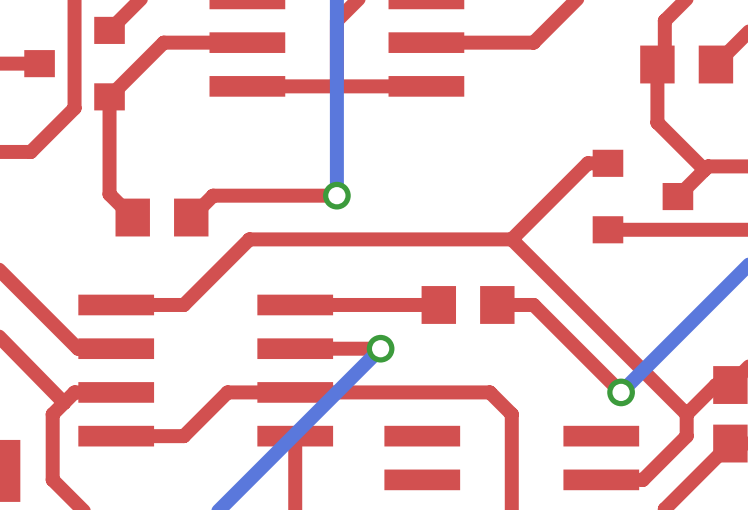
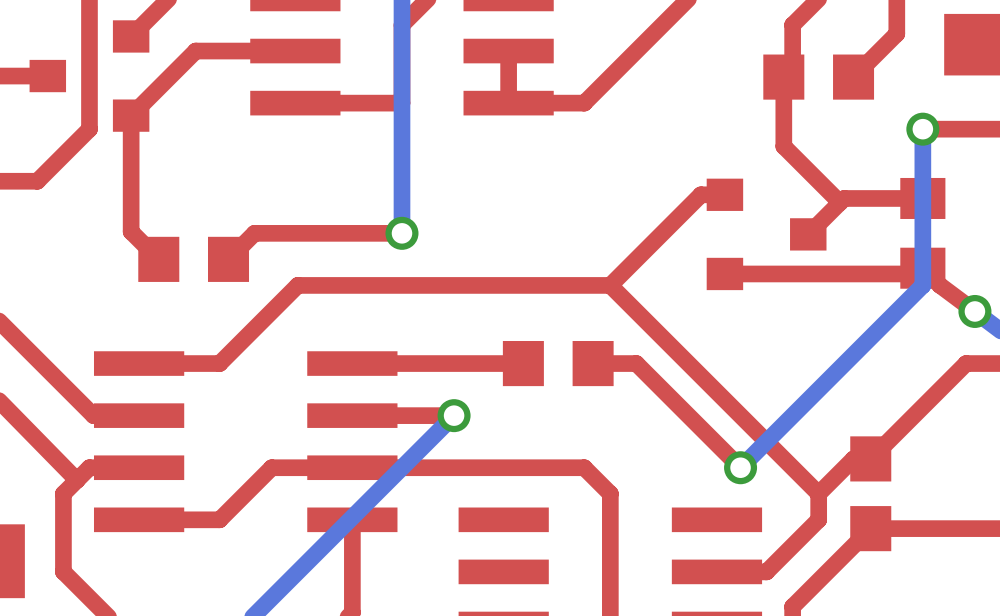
top track: (533, 42) (426, 42) -> (636, 51) (584, 103) (508, 103) (508, 51)
top track: (426, 86) (336, 86) -> none

